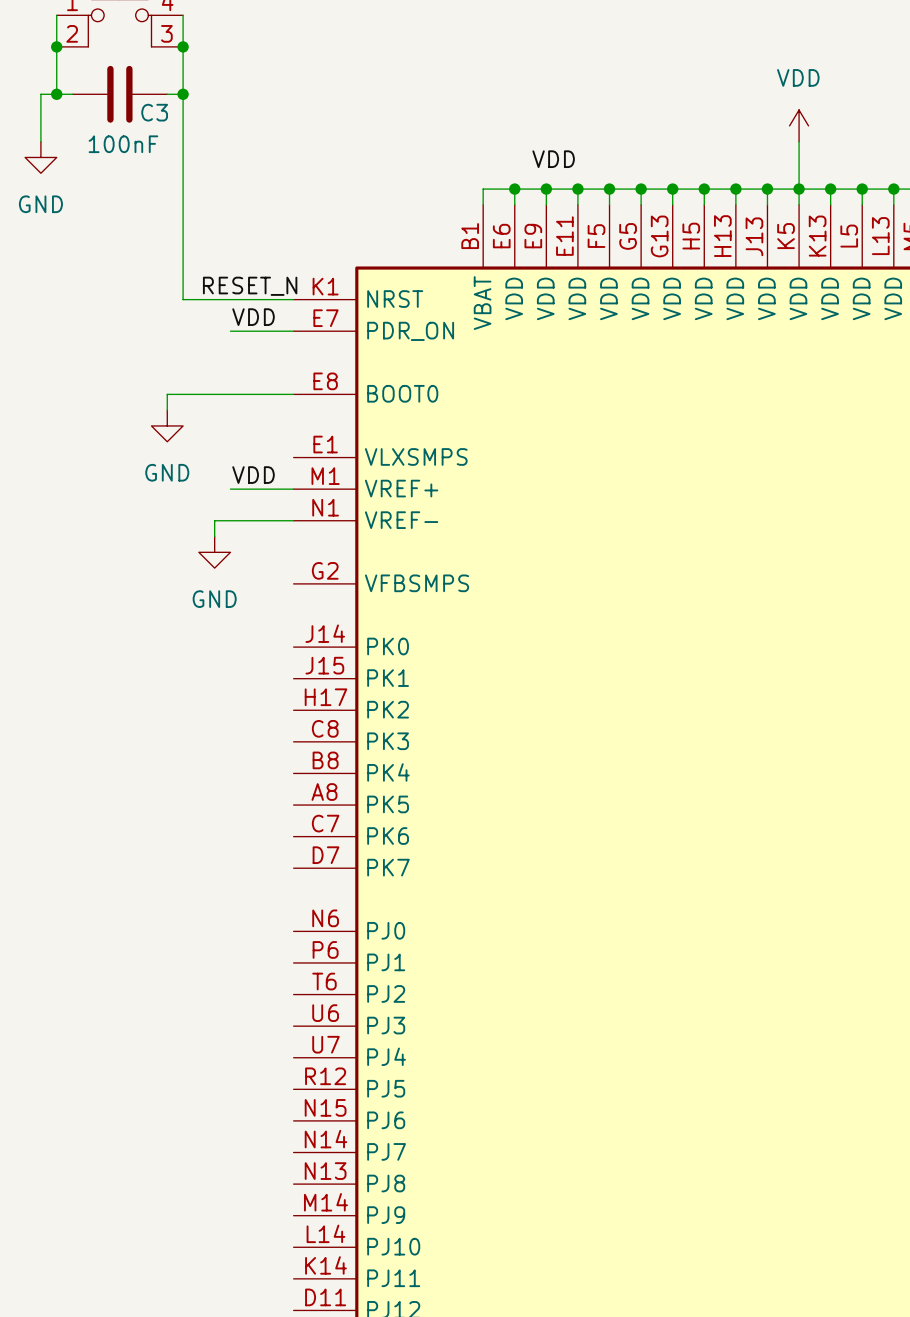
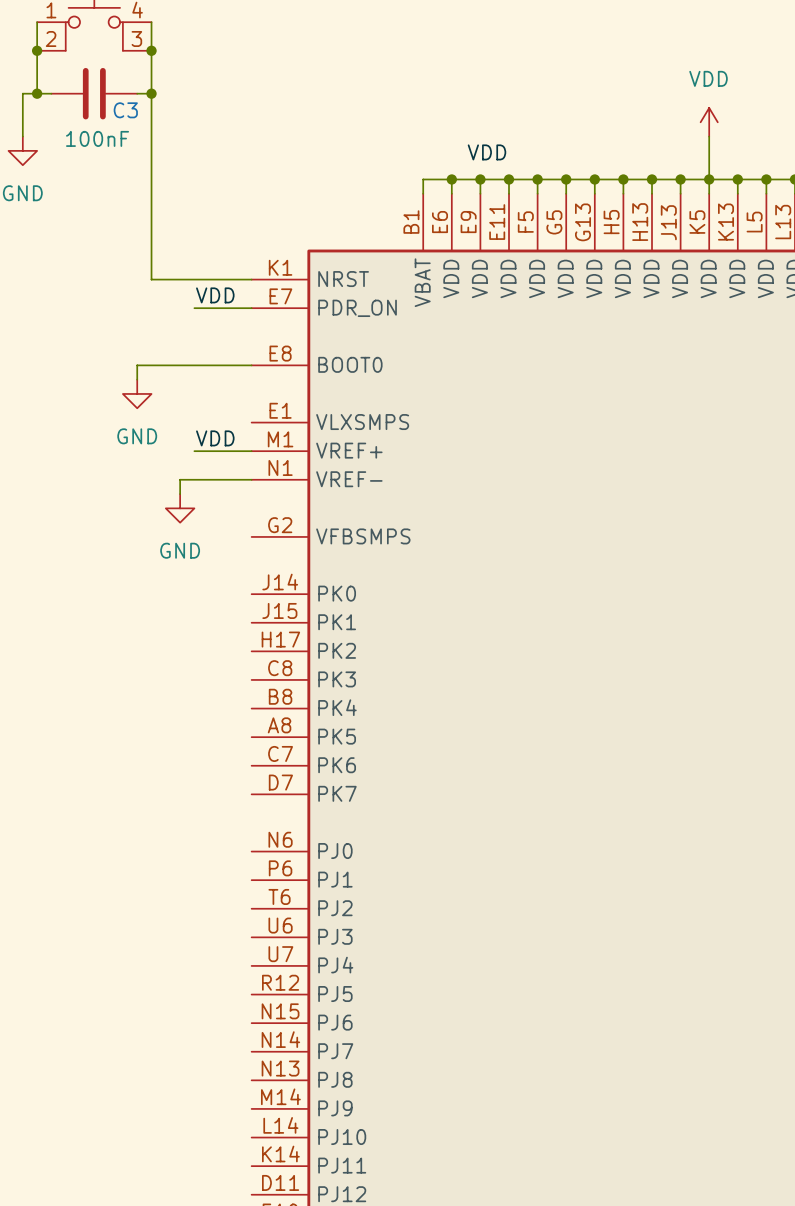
label: RESET_N (250, 286) -> none

